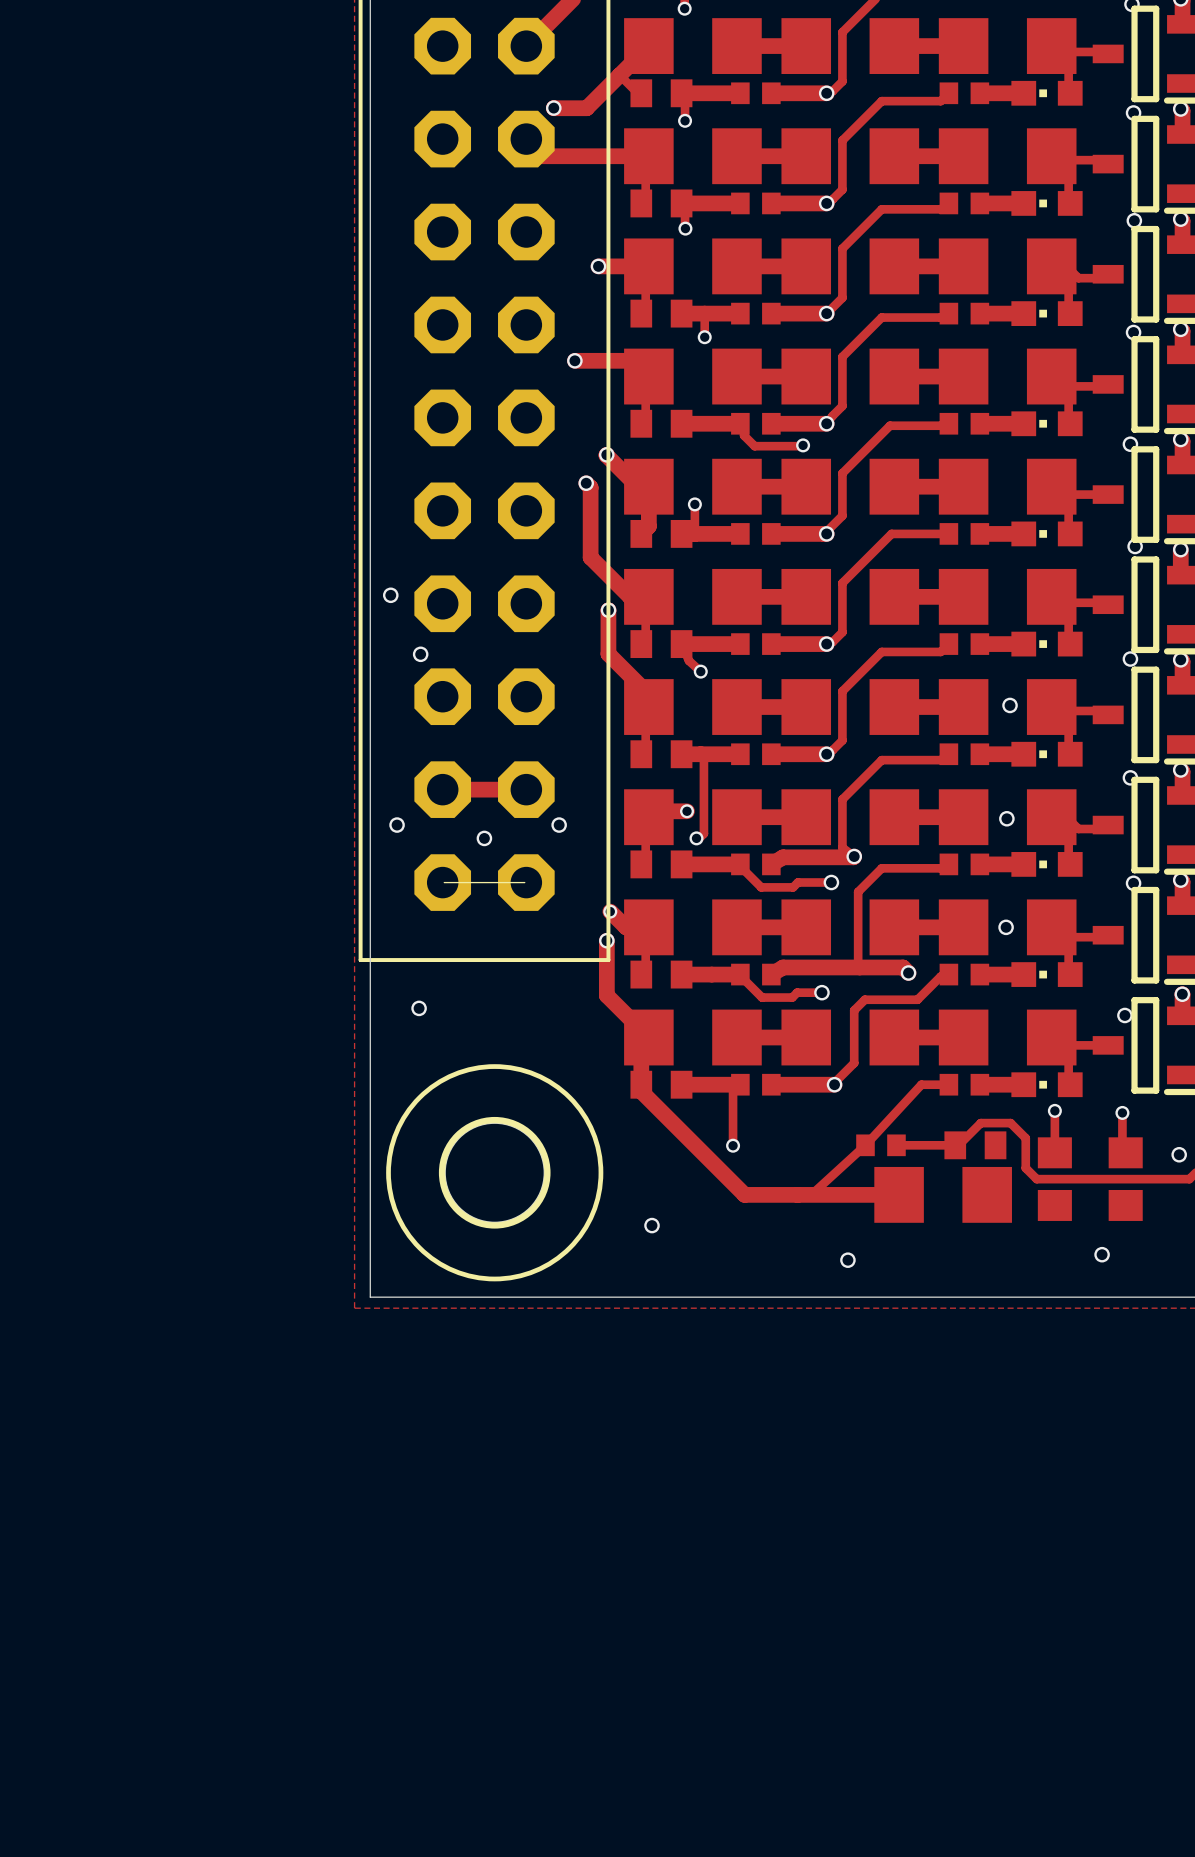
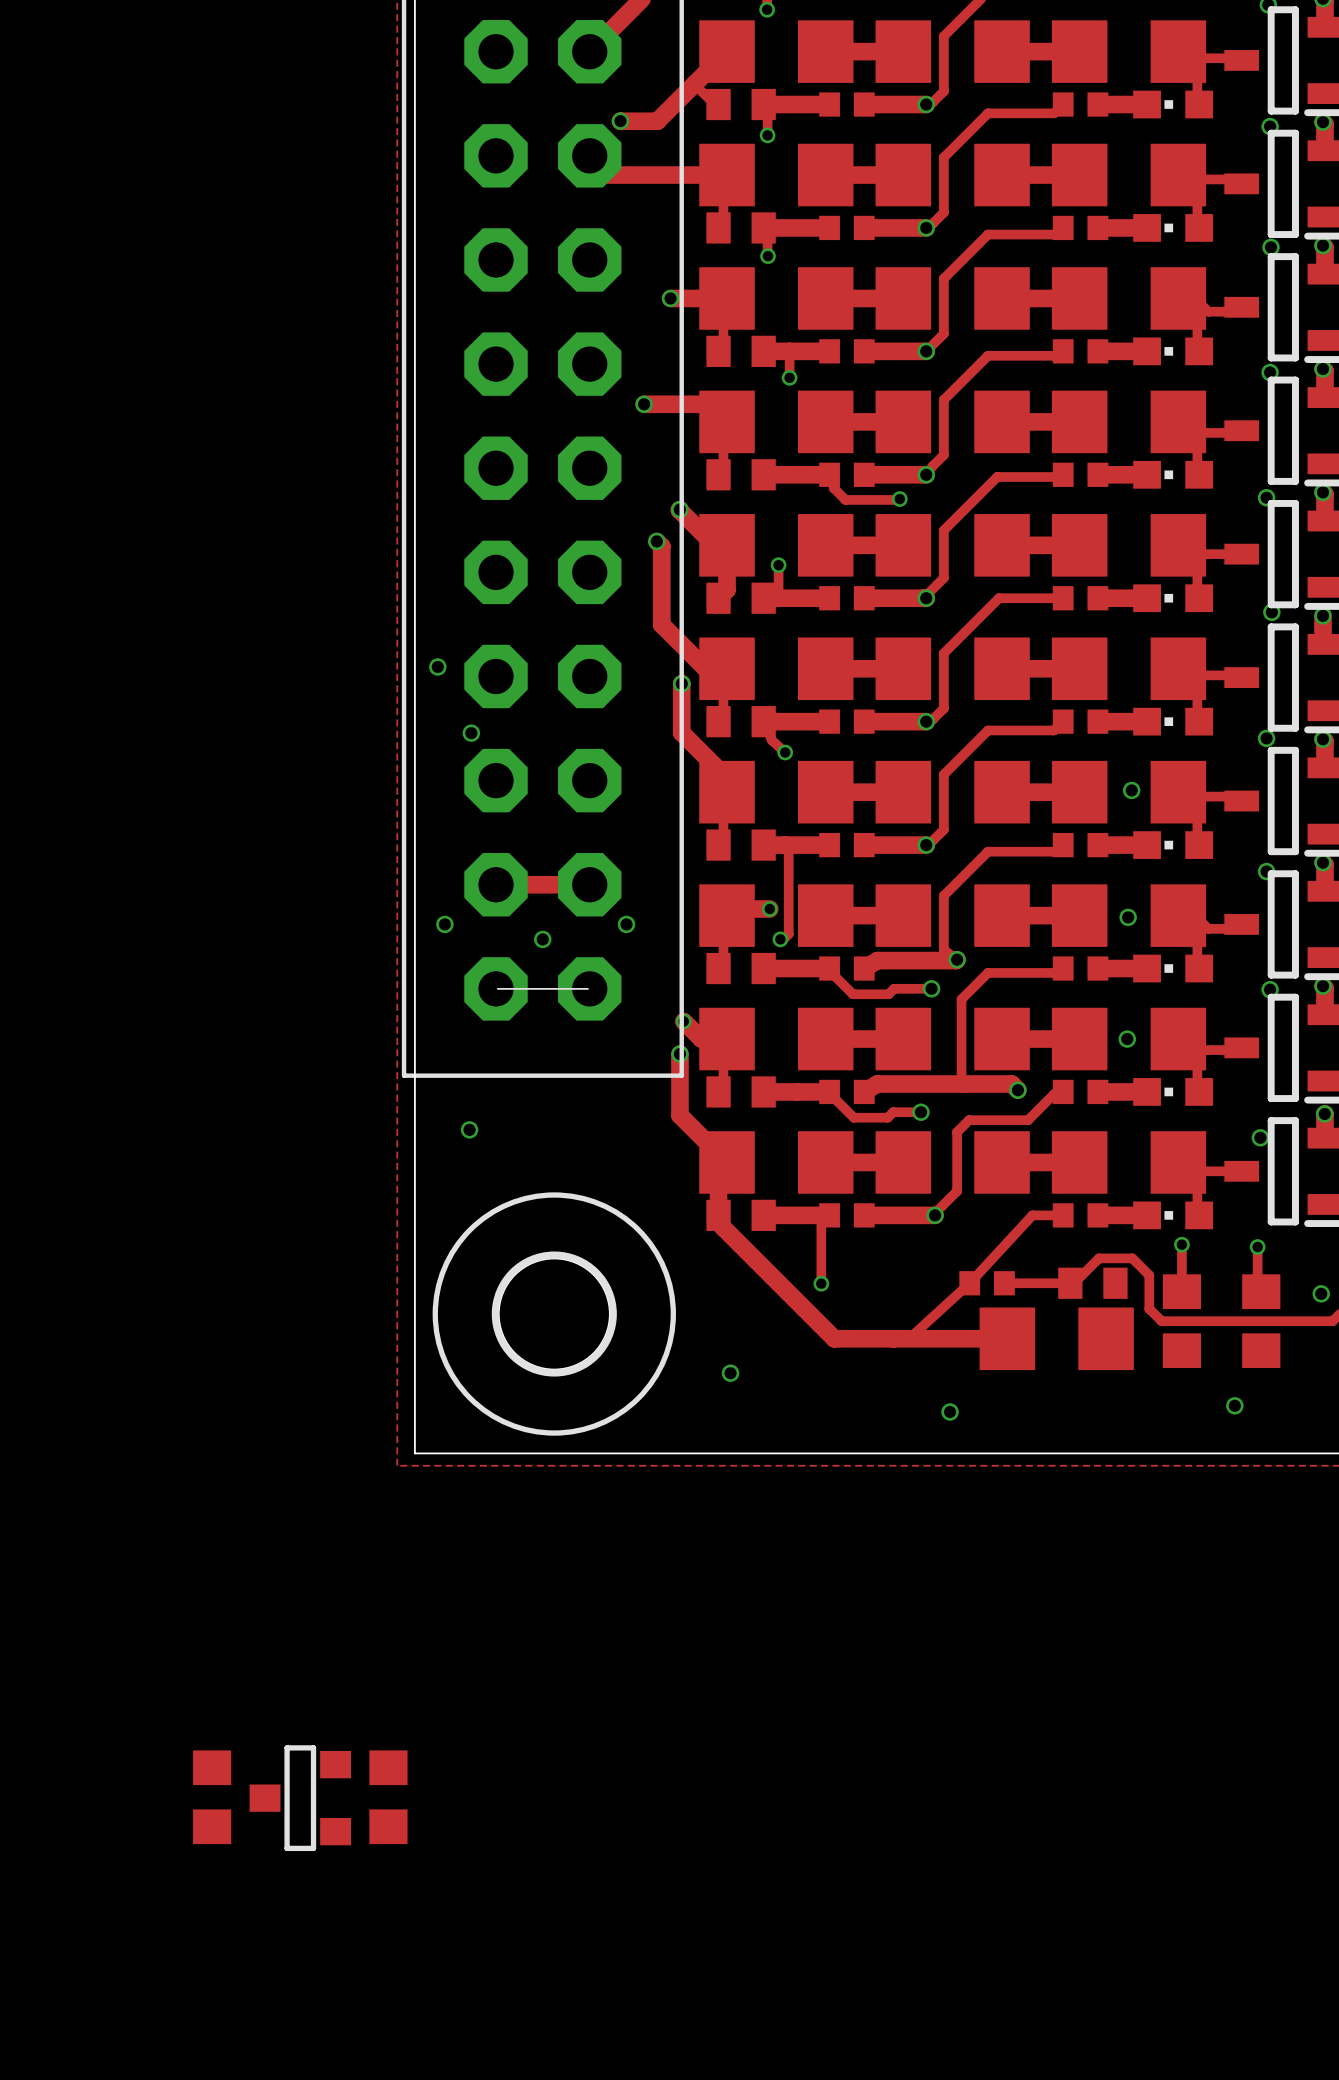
part: none -> (212, 1797)
part: none -> (300, 1798)
part: none -> (388, 1797)

